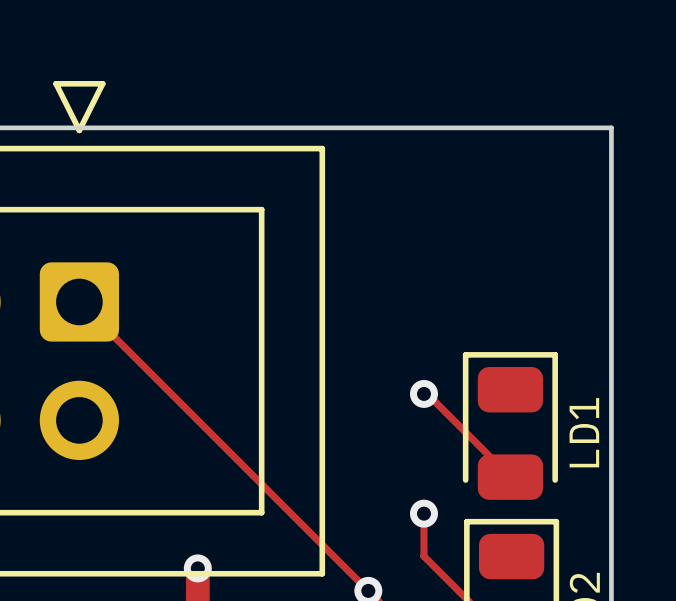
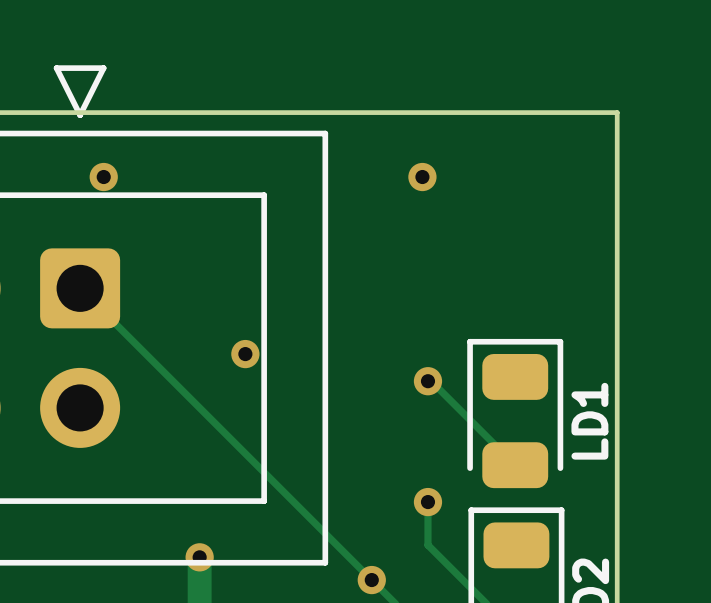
via: none -> (103, 177)
via: none -> (422, 177)
via: none -> (245, 354)

